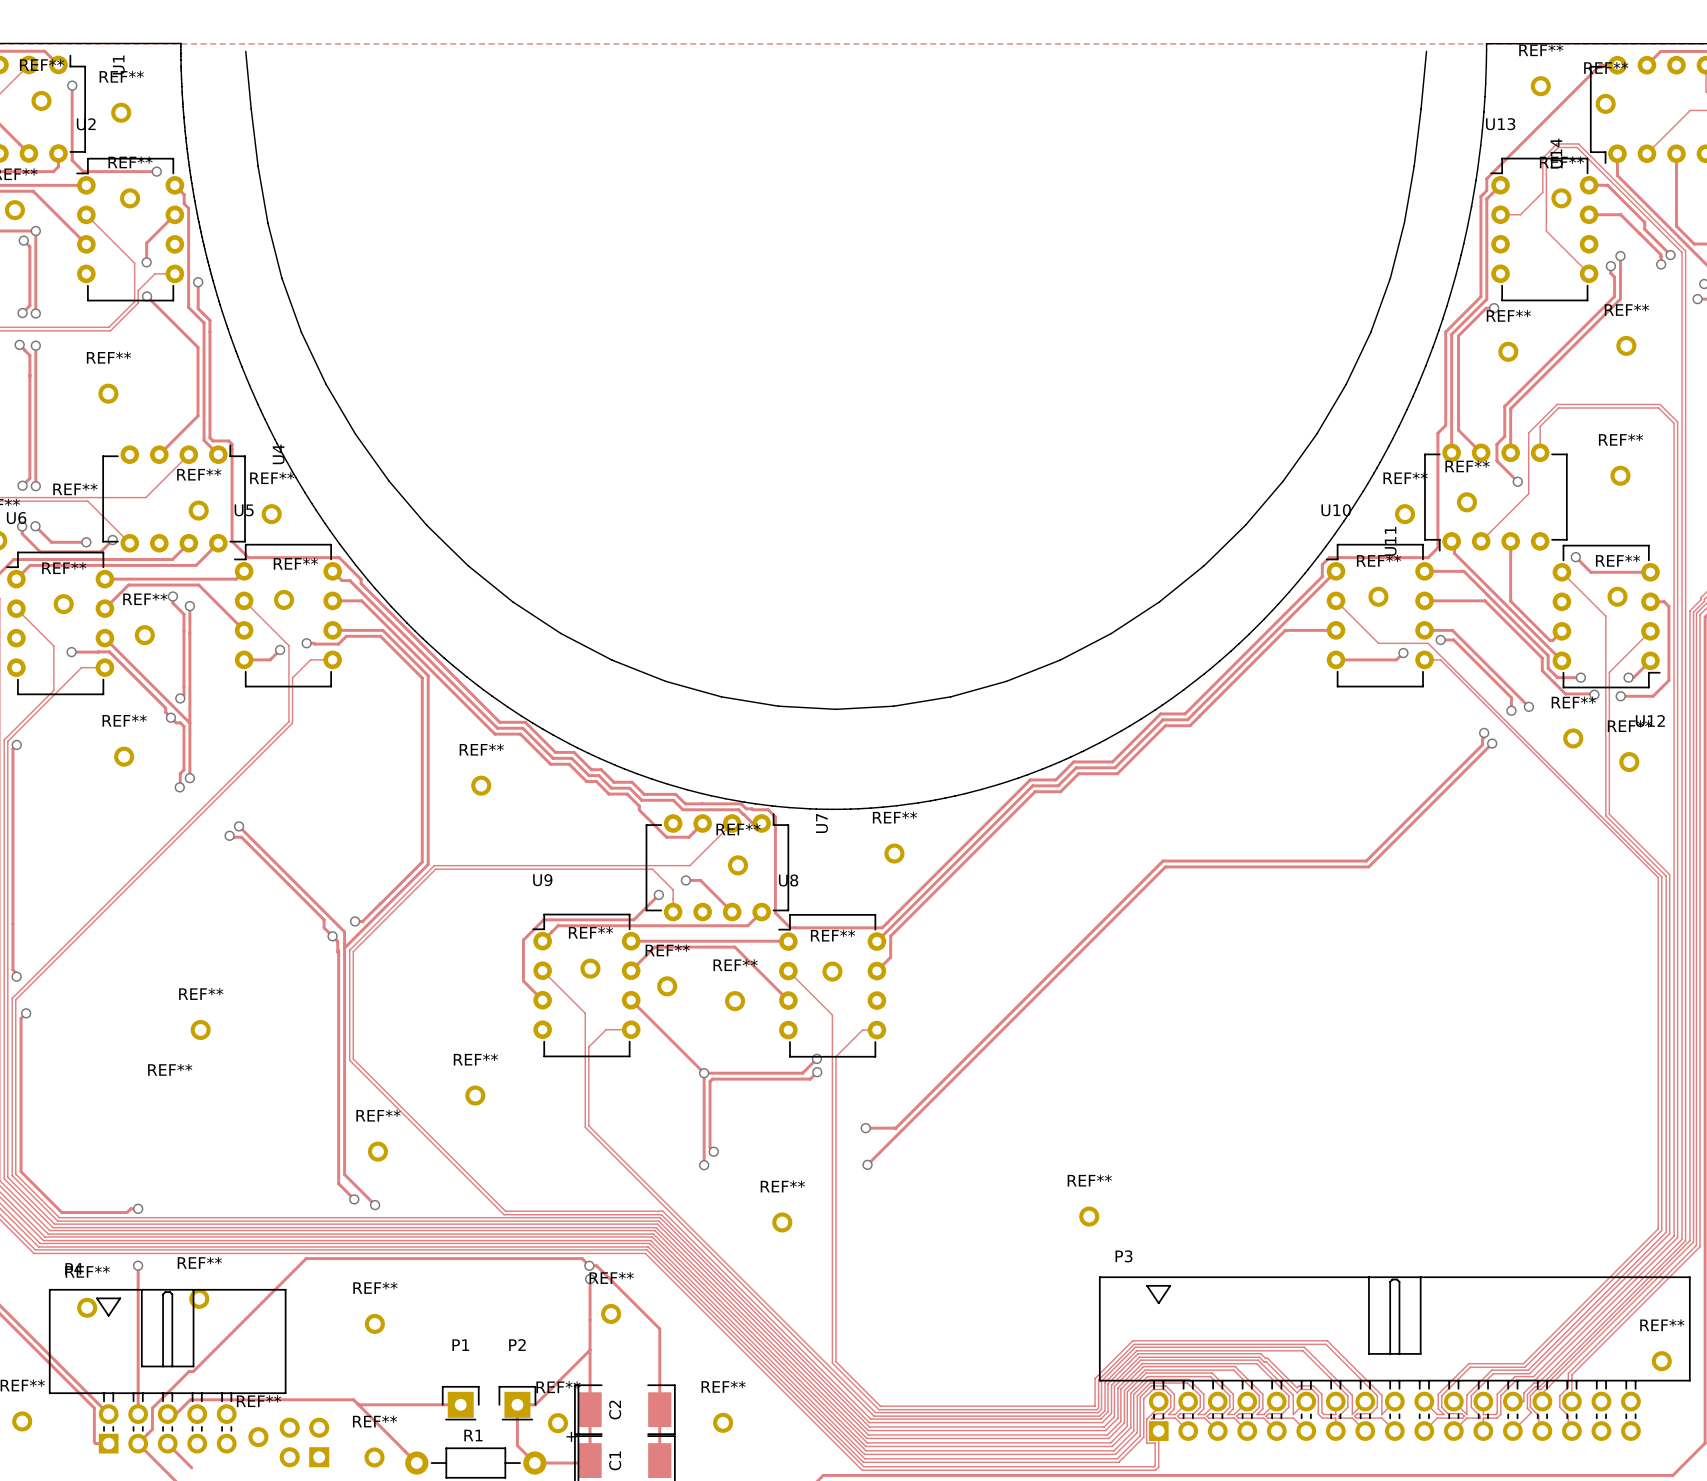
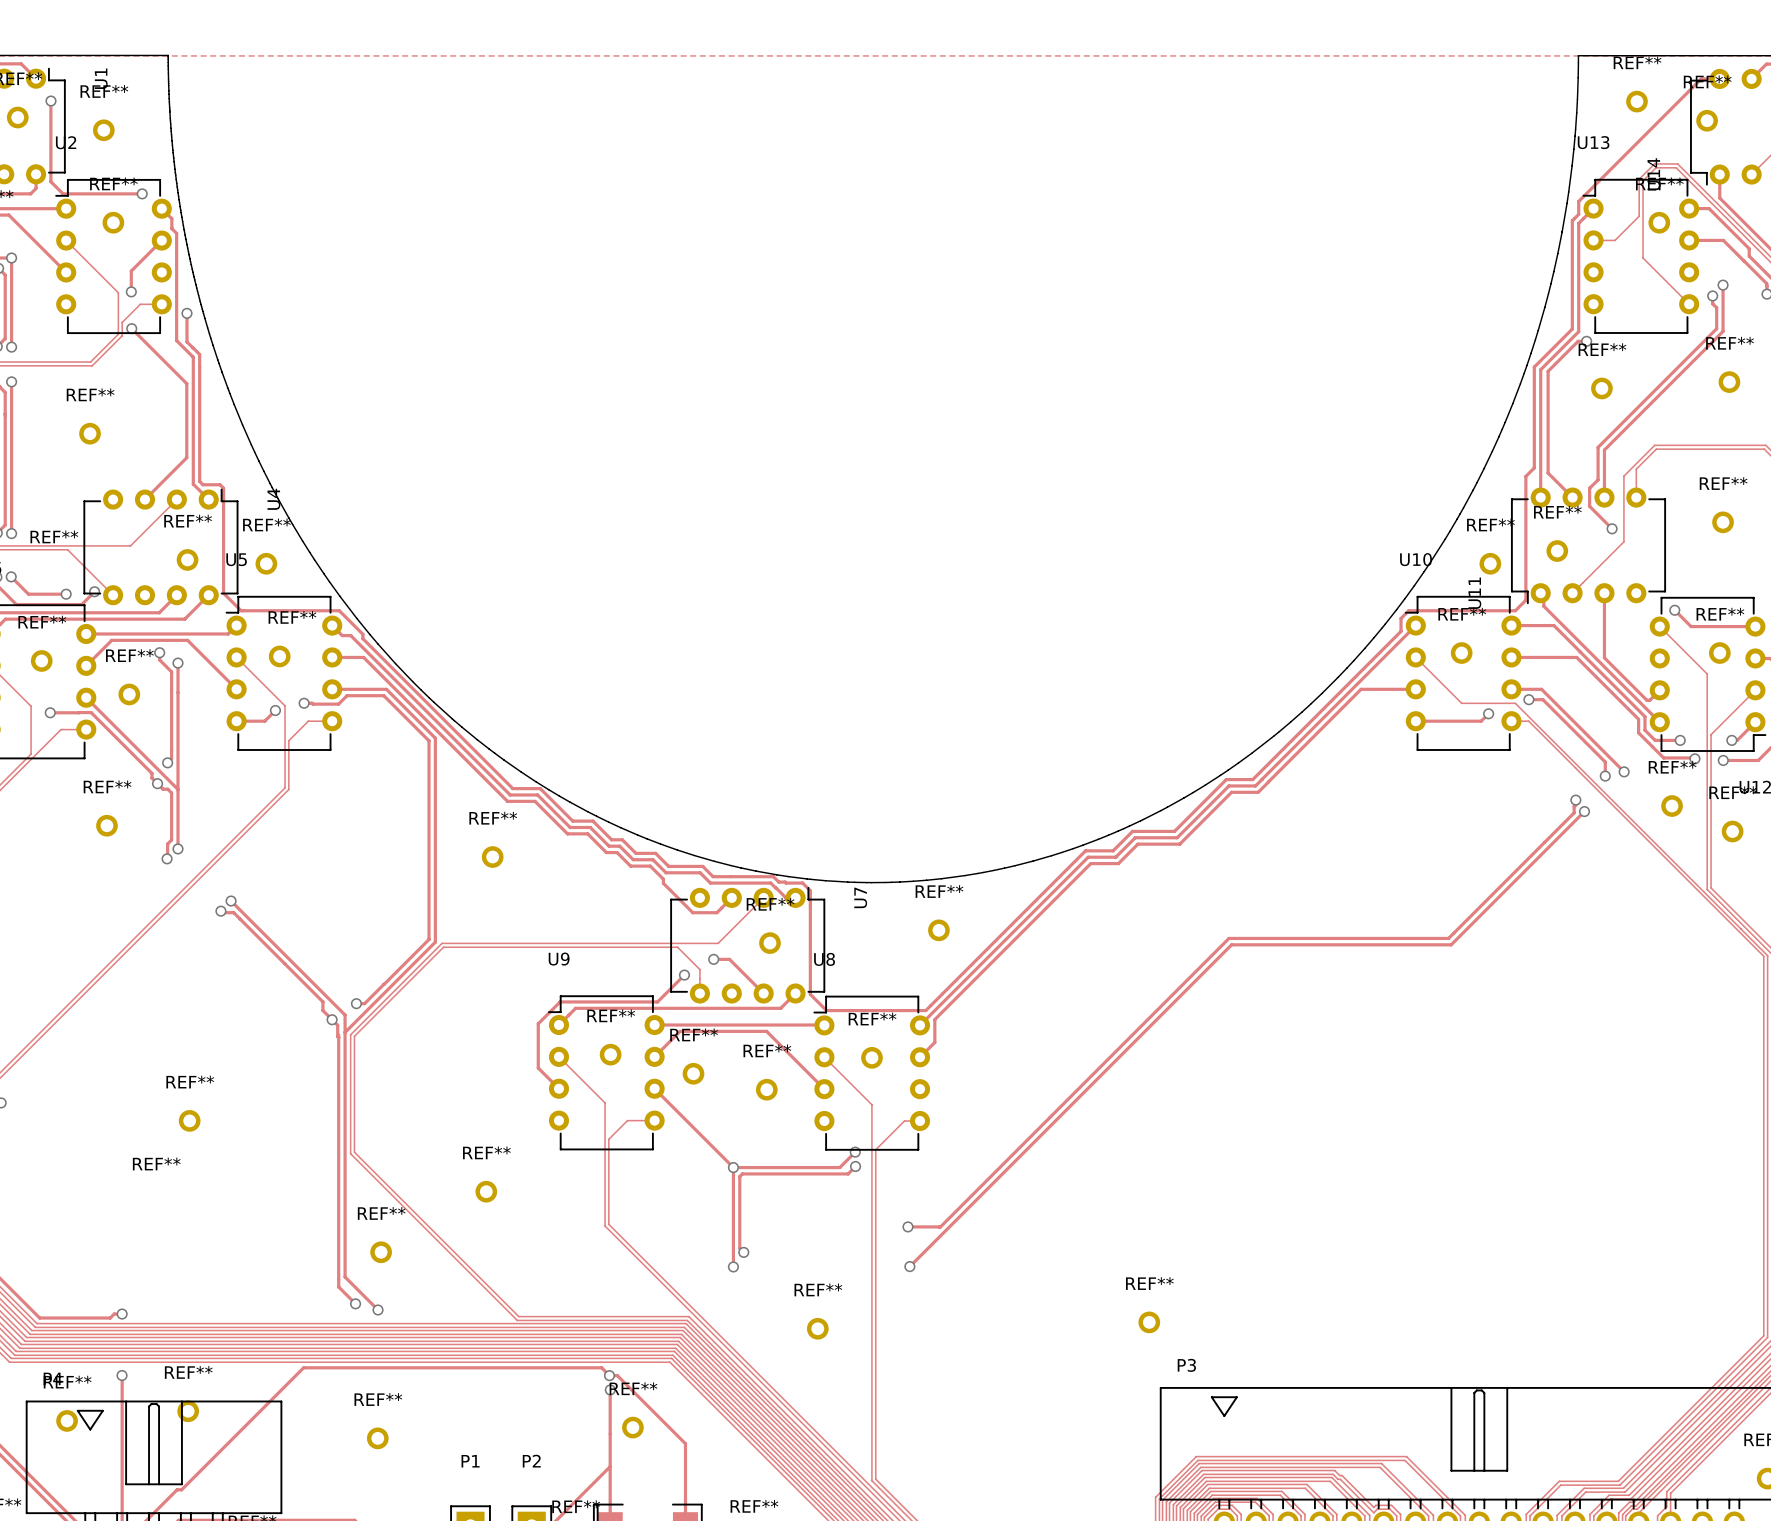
board edge: (245, 51) (258, 166) (267, 222) (281, 278) (301, 332) (326, 384) (355, 434) (389, 481) (426, 525) (467, 565) (512, 601) (560, 633) (612, 660) (665, 681) (721, 696) (778, 706) (836, 709) (893, 706) (950, 696) (1006, 681) (1060, 660) (1111, 633) (1159, 601) (1204, 565) (1245, 525) (1283, 481) (1316, 434) (1346, 384) (1370, 332) (1390, 278) (1404, 222) (1414, 166) (1426, 51) -> none

